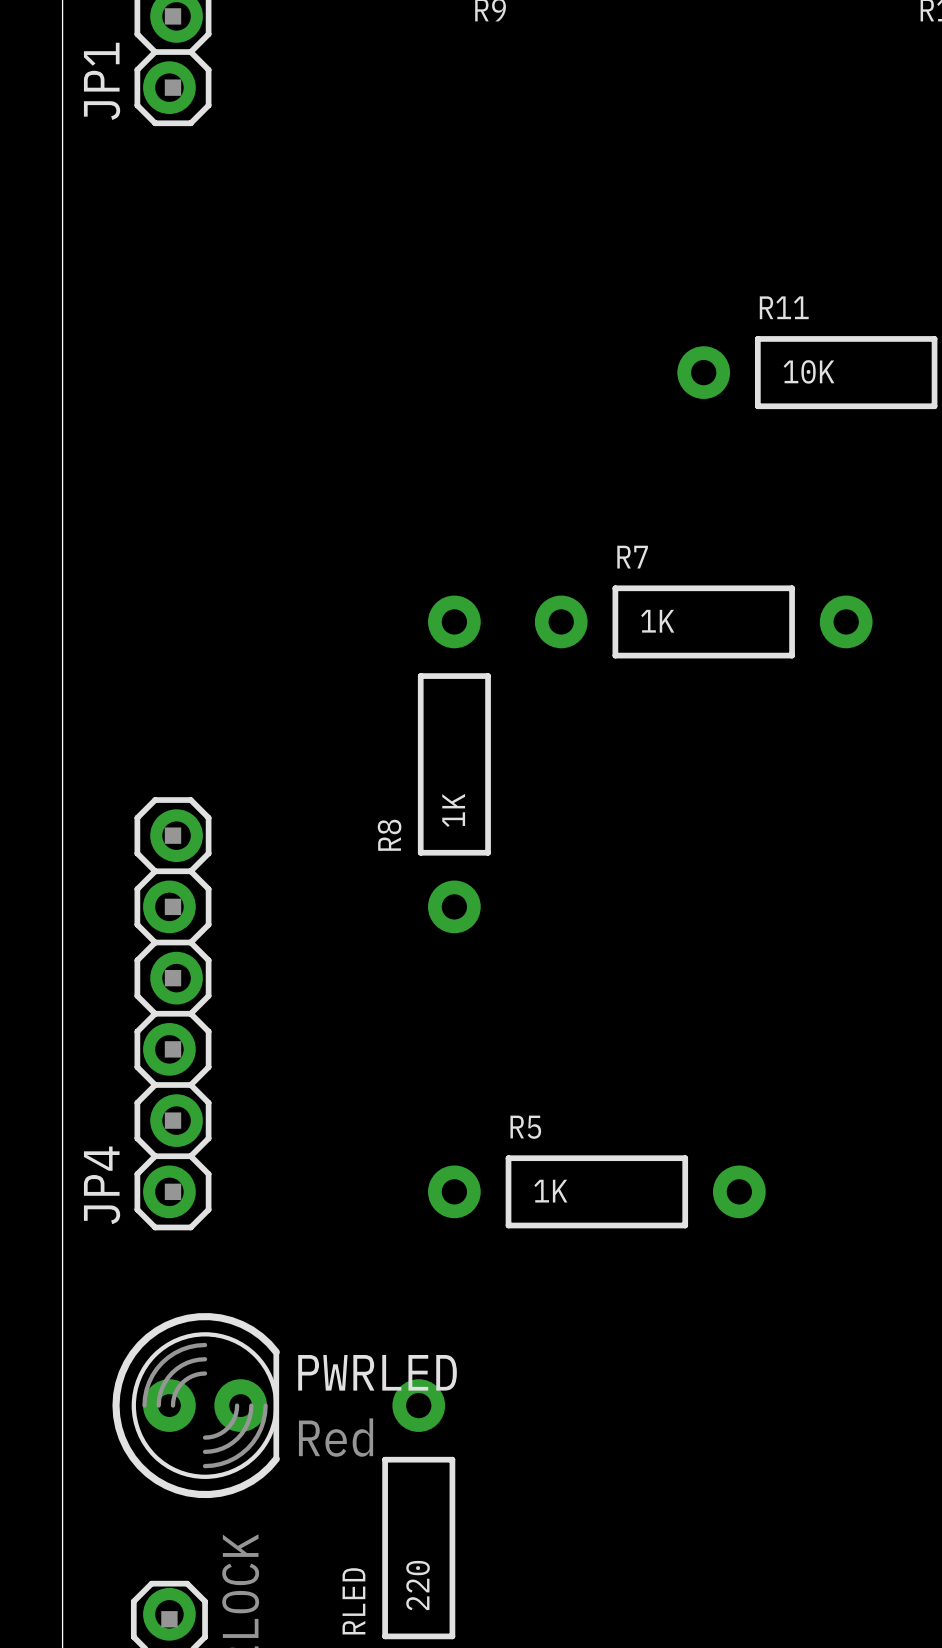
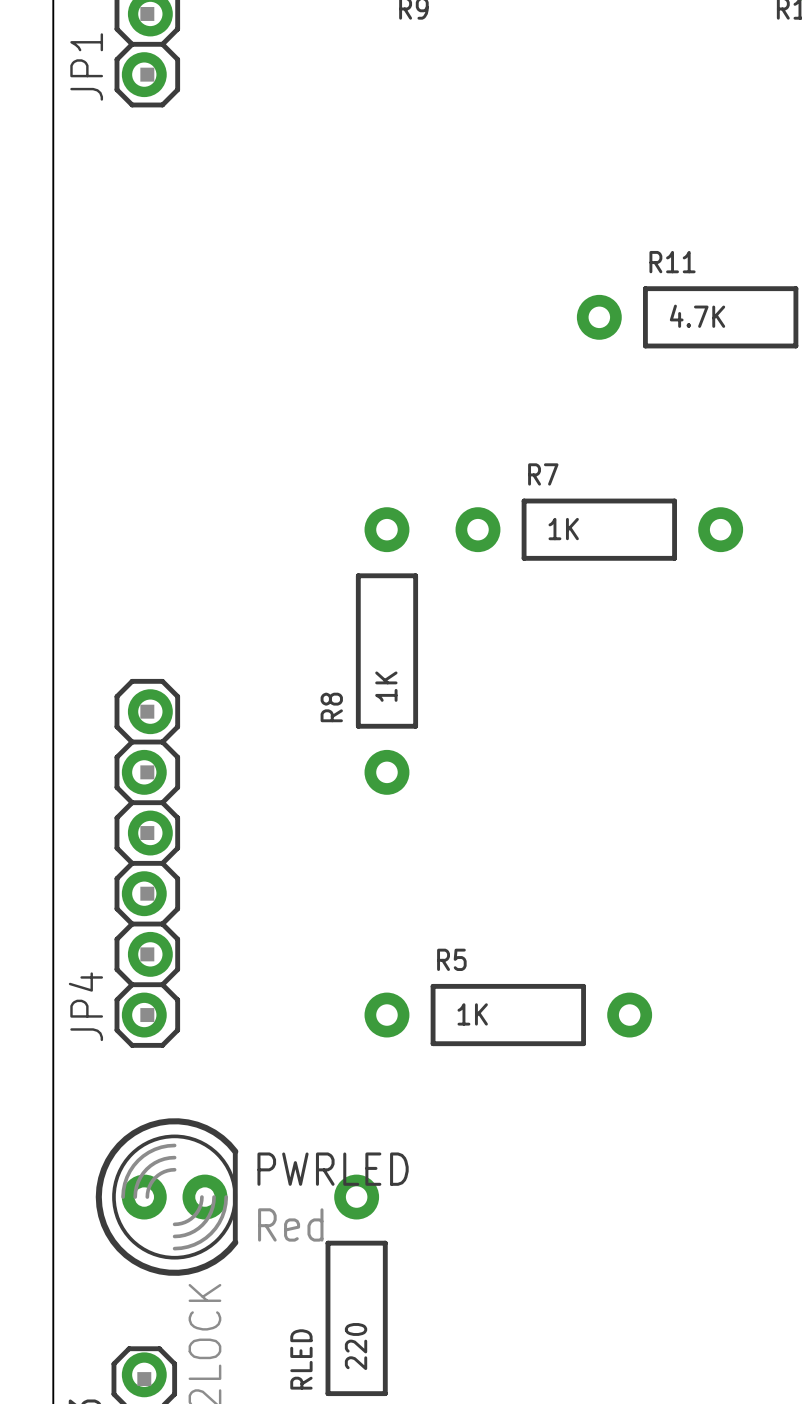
R11 value: 10K (808, 371) -> 4.7K (697, 316)

